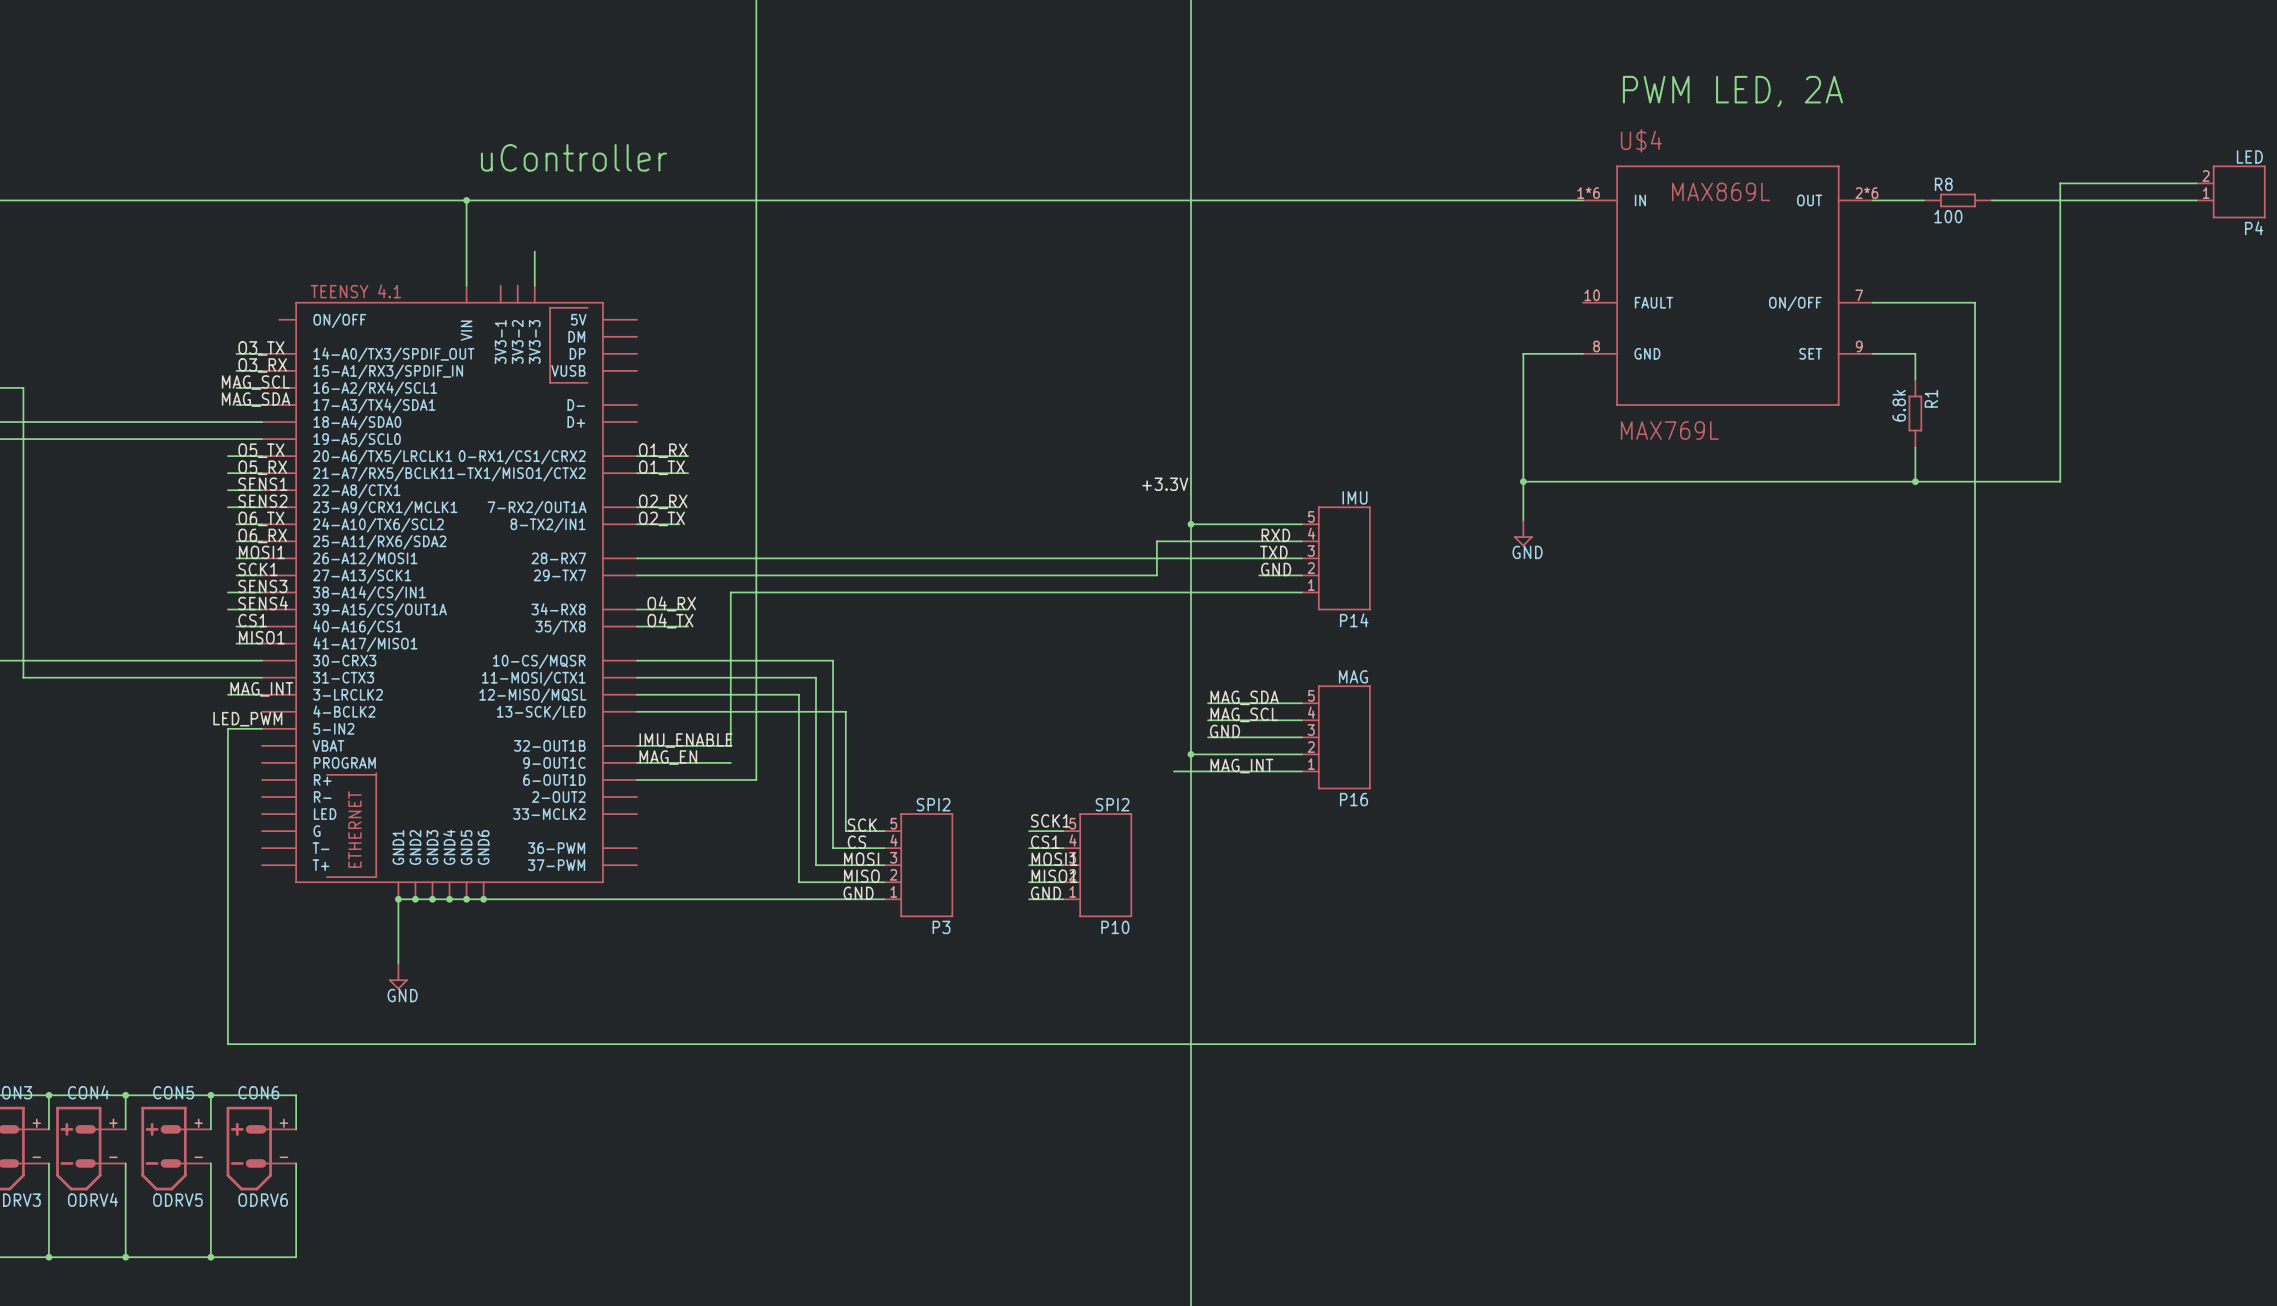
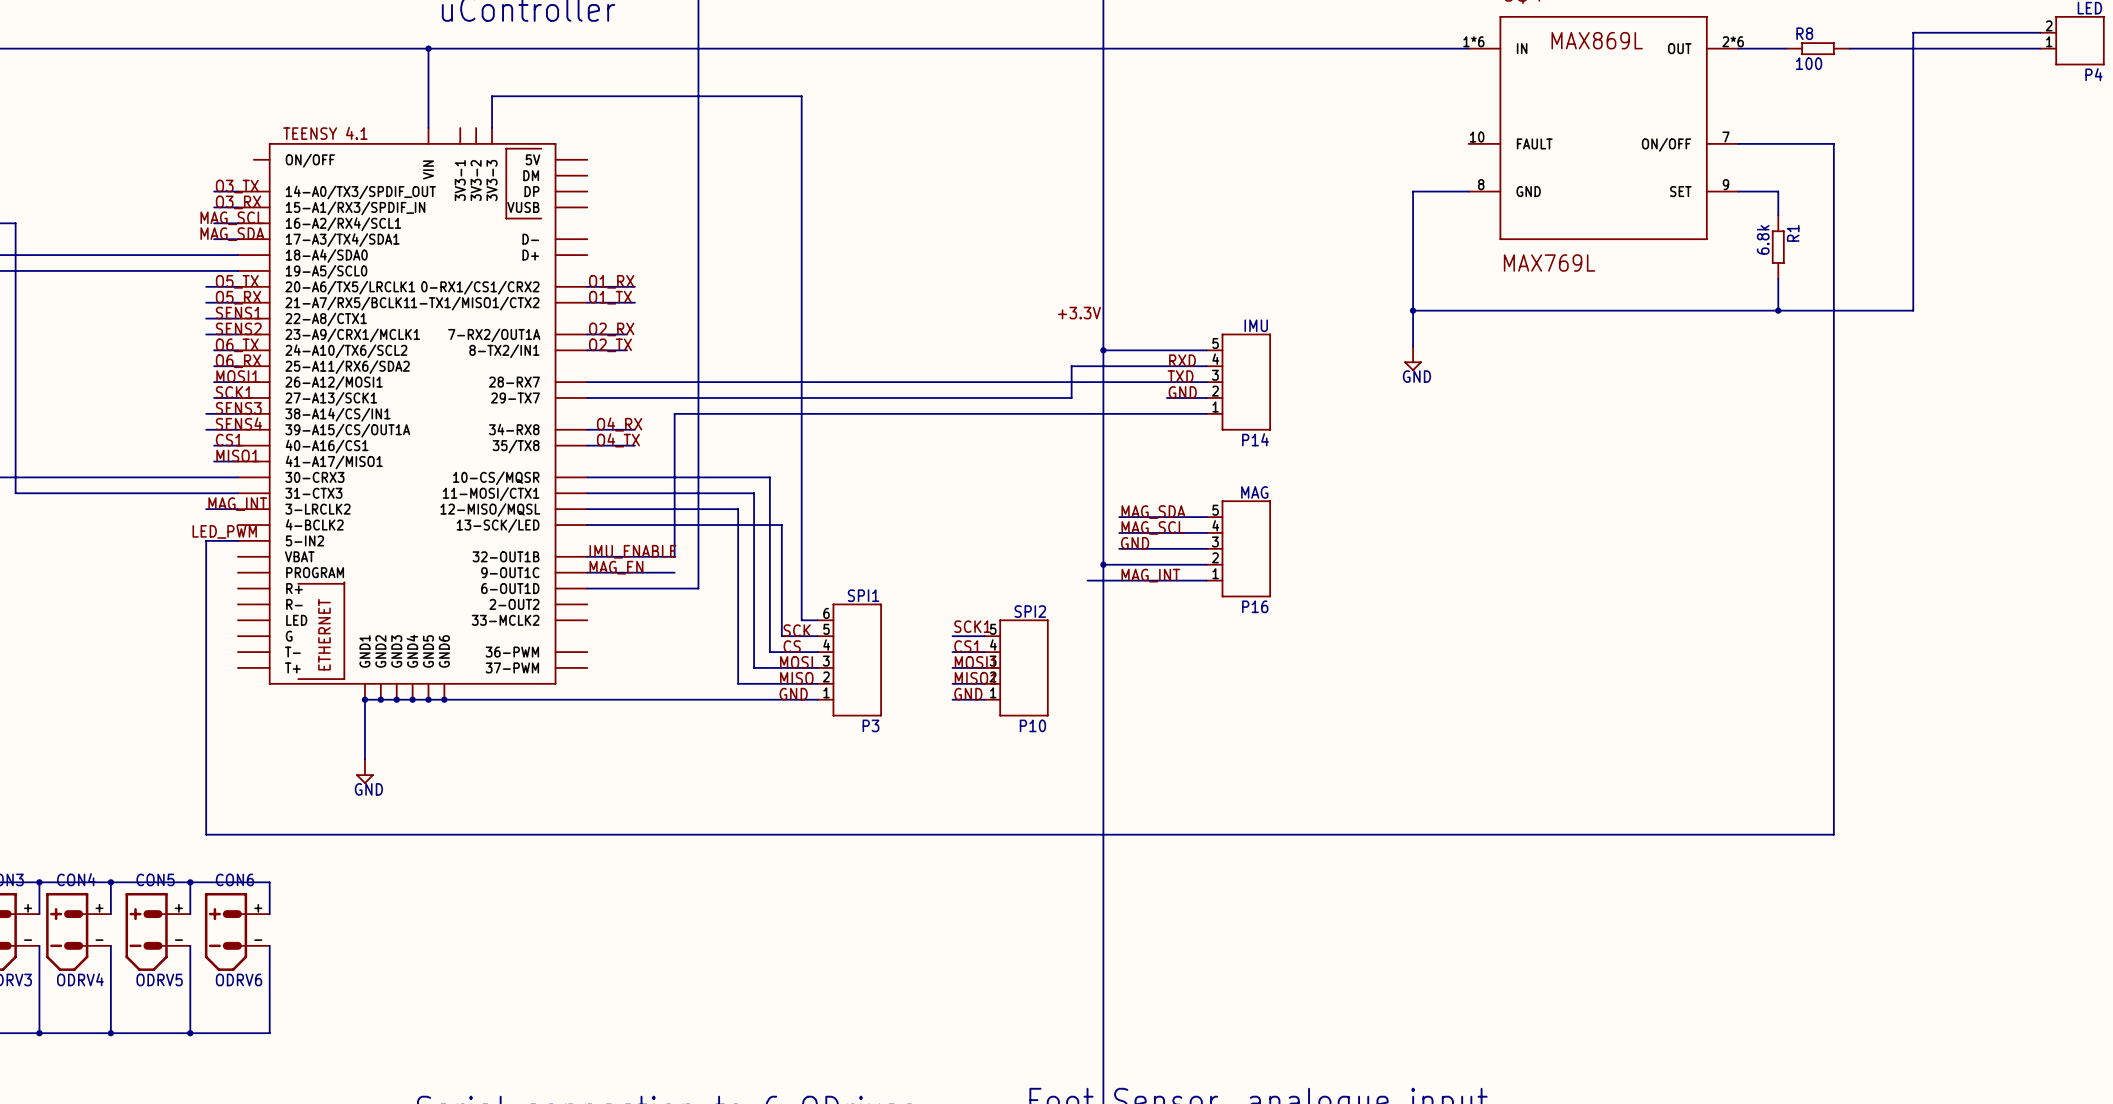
wire: none -> (492, 96) (801, 96) (801, 620) (817, 620)
P3 value: SPI2 (933, 804) -> SPI1 (863, 595)
P3 symbol: [884, 813, 953, 917] -> [817, 603, 882, 717]

